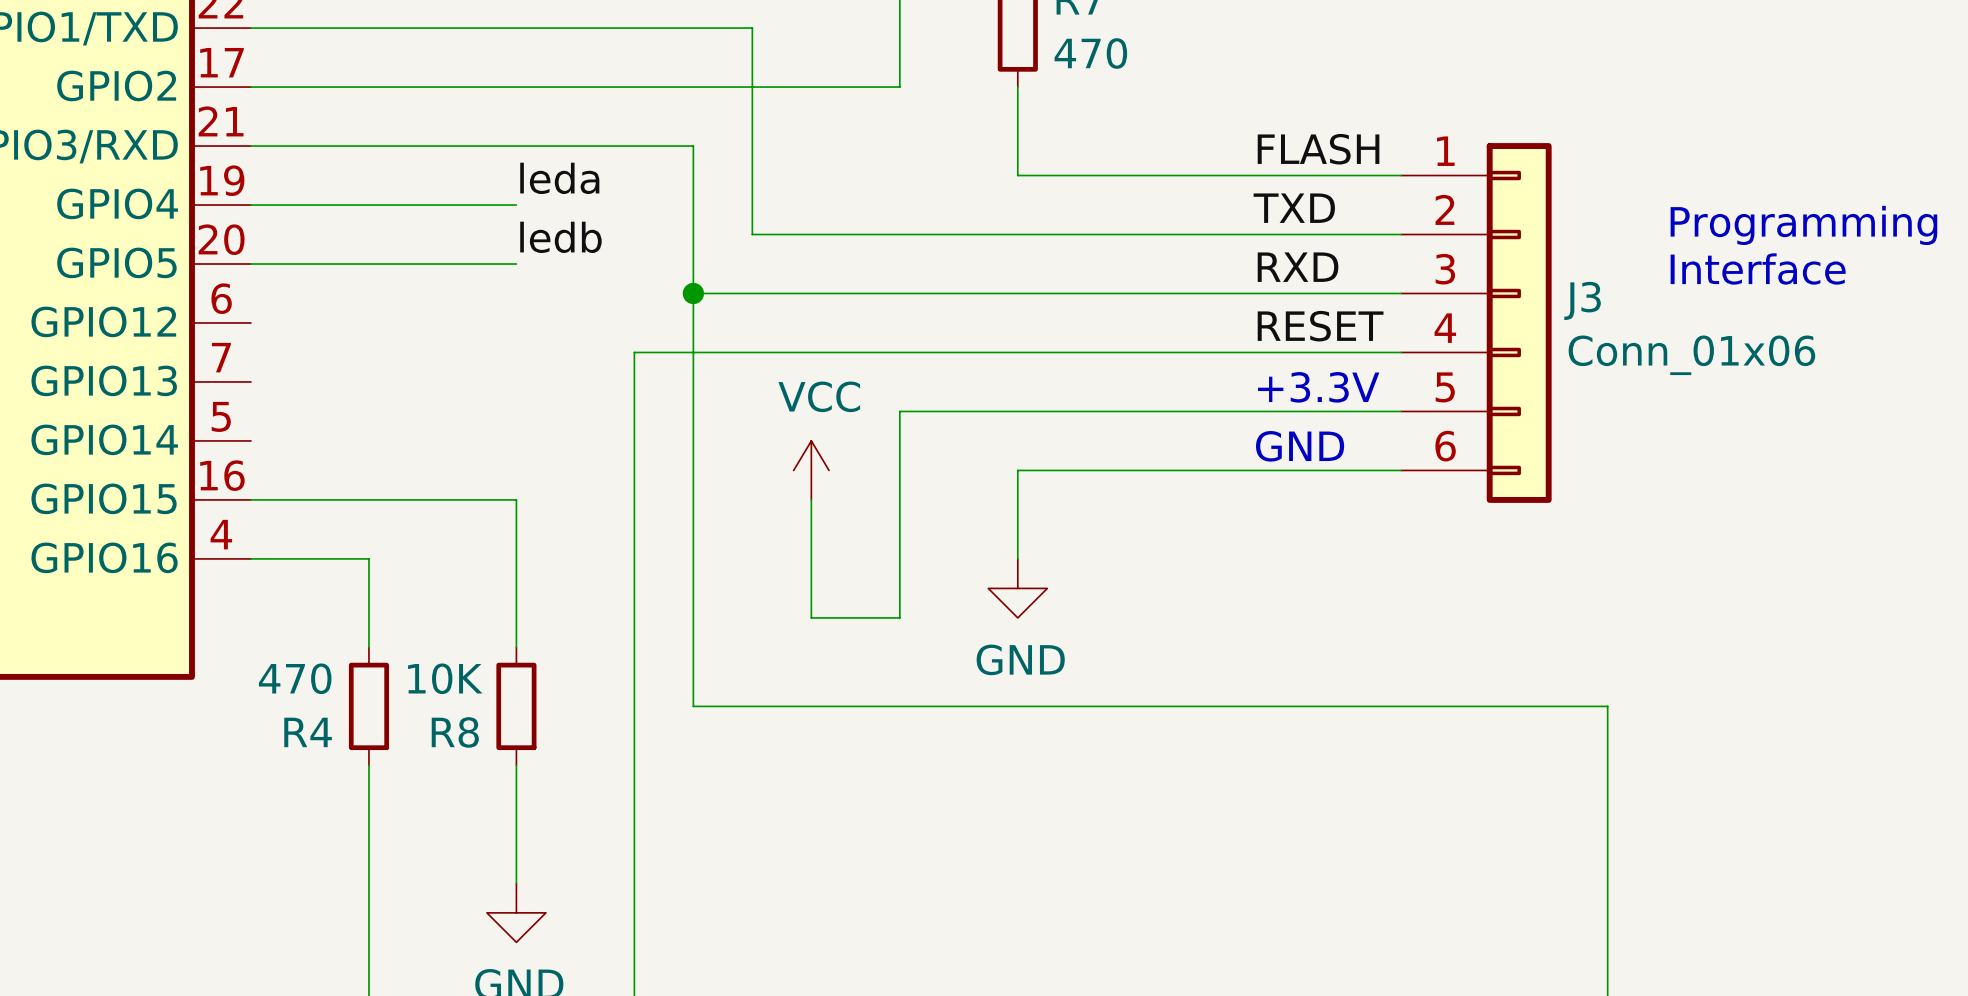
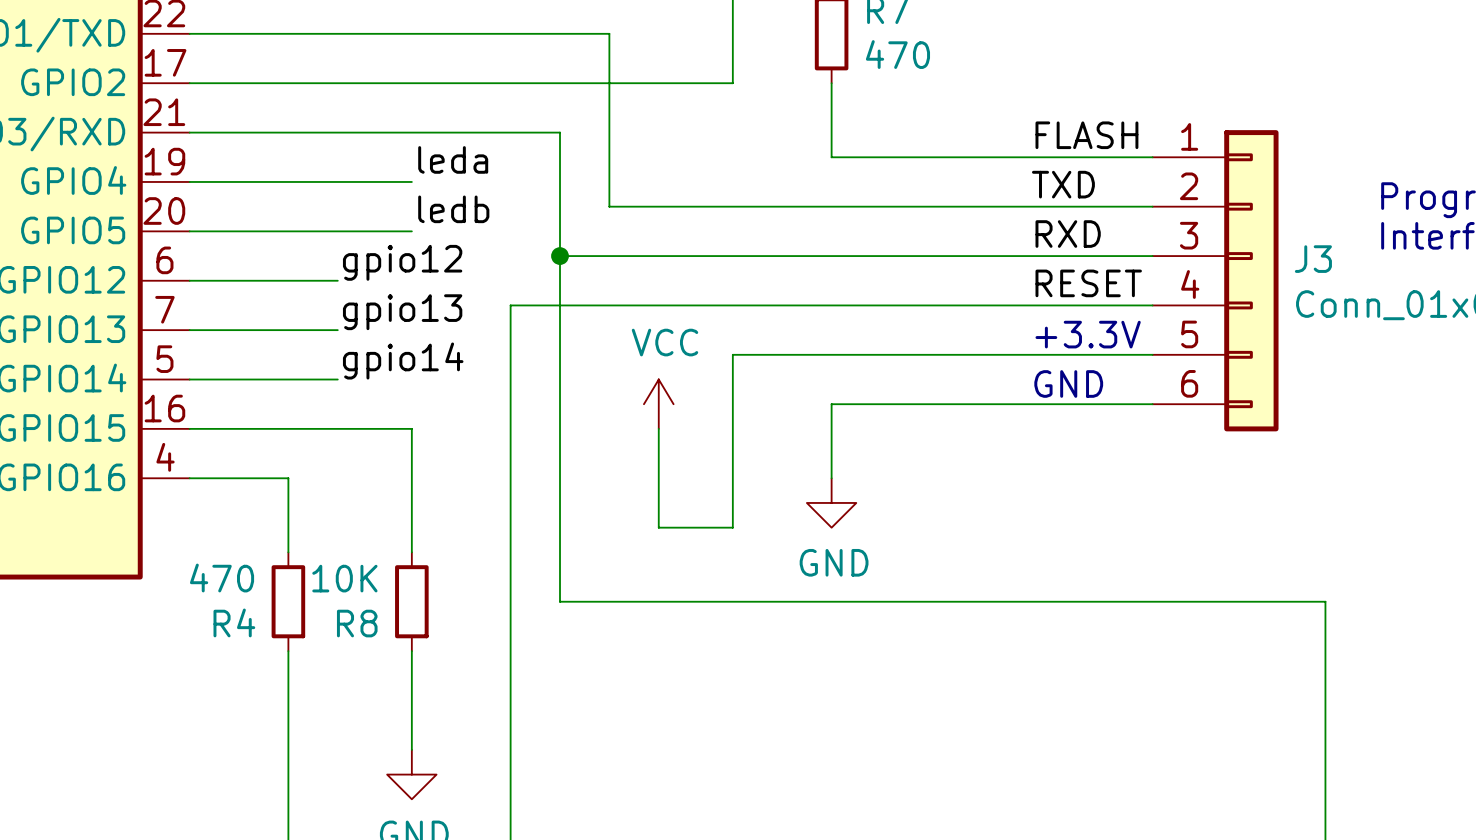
label: none -> gpio12 (402, 262)
wire: none -> (189, 280) (337, 280)
label: none -> gpio13 (402, 312)
wire: none -> (189, 330) (337, 330)
label: none -> gpio14 (403, 361)
wire: none -> (189, 379) (337, 379)

